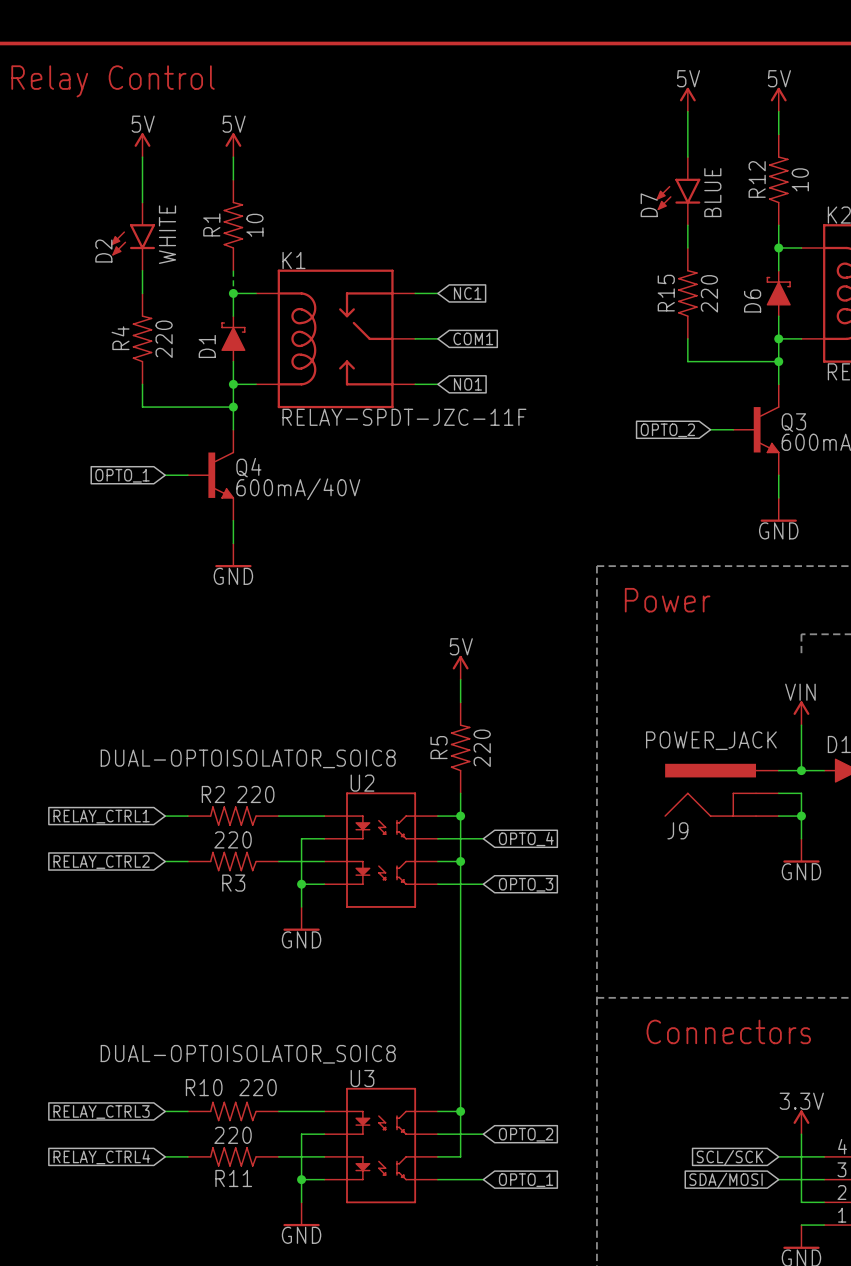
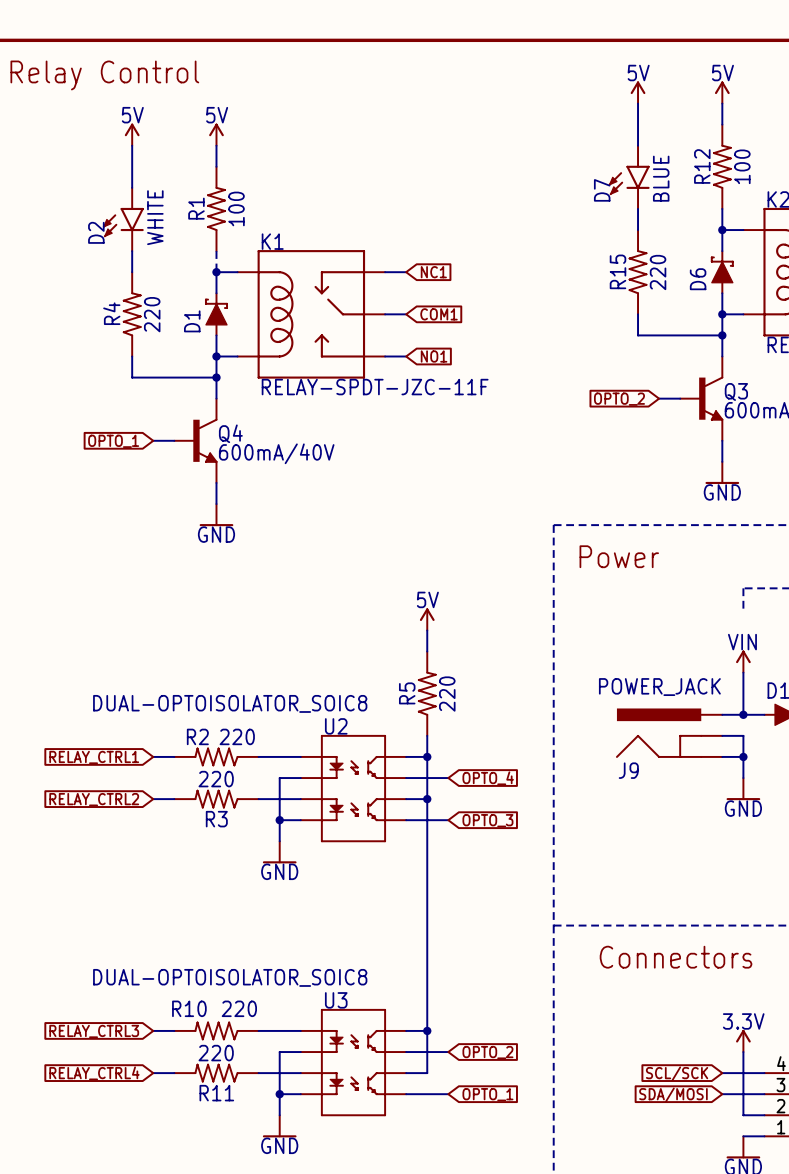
R12 value: 10 (800, 179) -> 100 (742, 166)
R1 value: 10 (254, 225) -> 100 (236, 208)

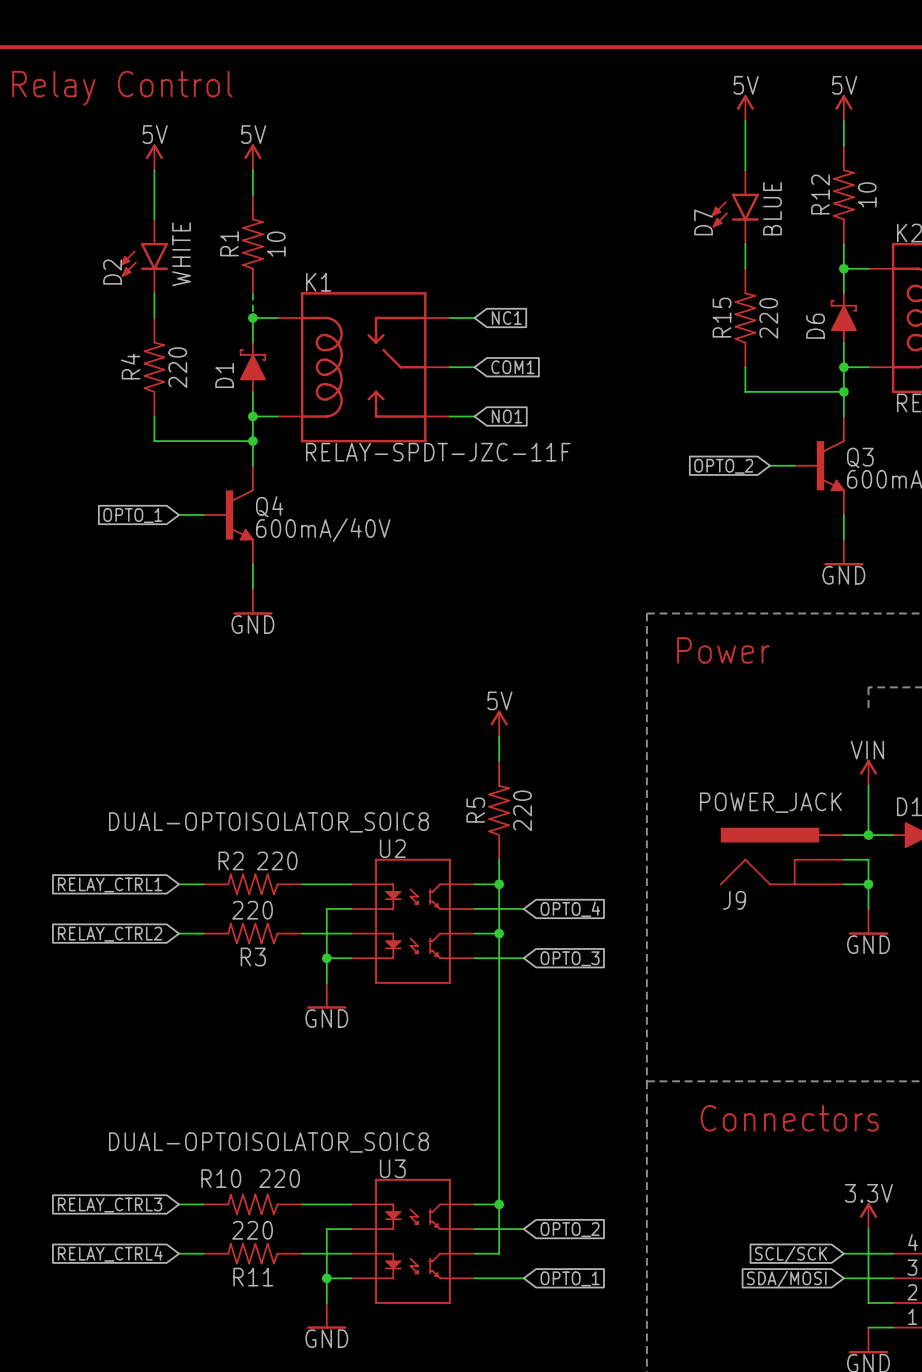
R12 value: 100 (742, 166) -> 10 (867, 194)
R1 value: 100 (236, 208) -> 10 (276, 244)

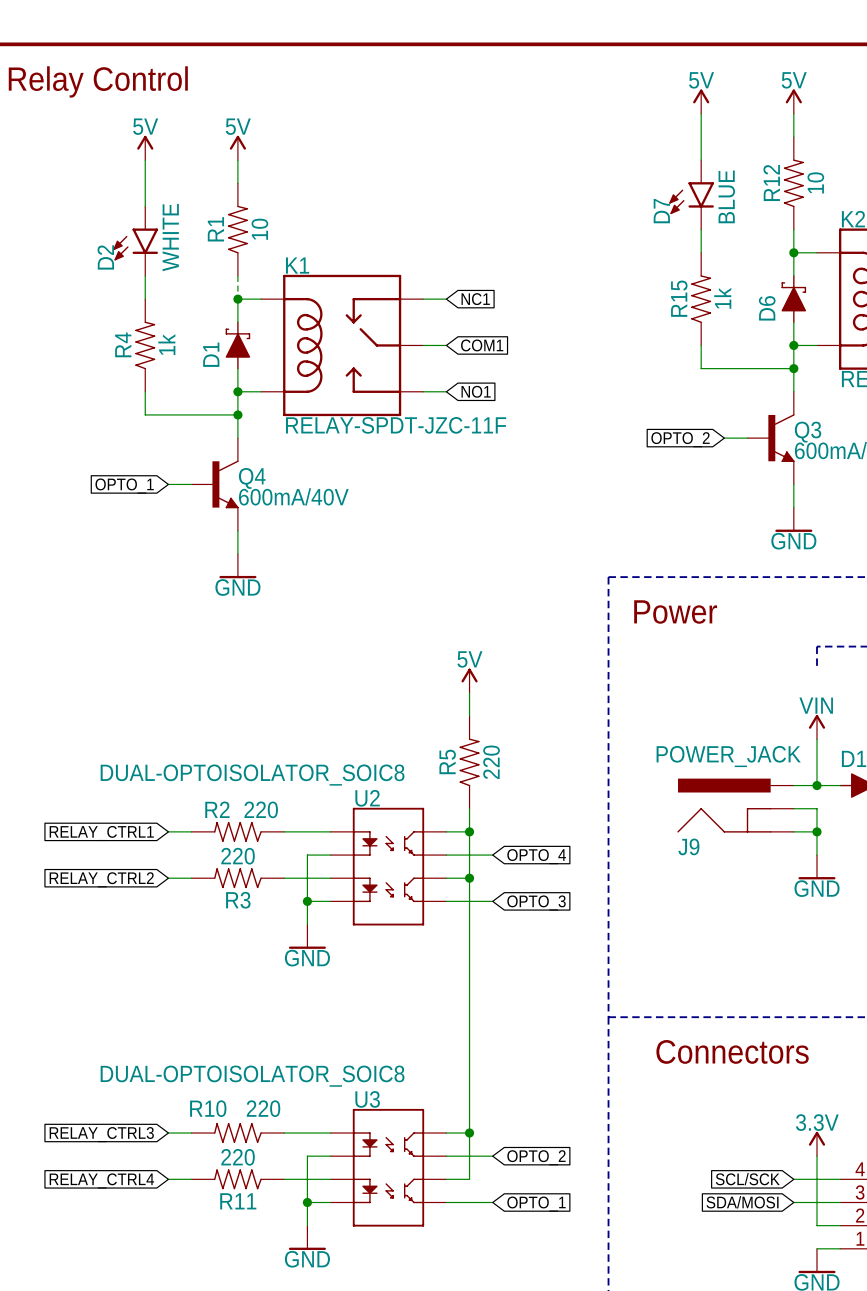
R15 value: 220 (768, 318) -> 1k (722, 298)
R4 value: 220 (177, 367) -> 1k (166, 344)

